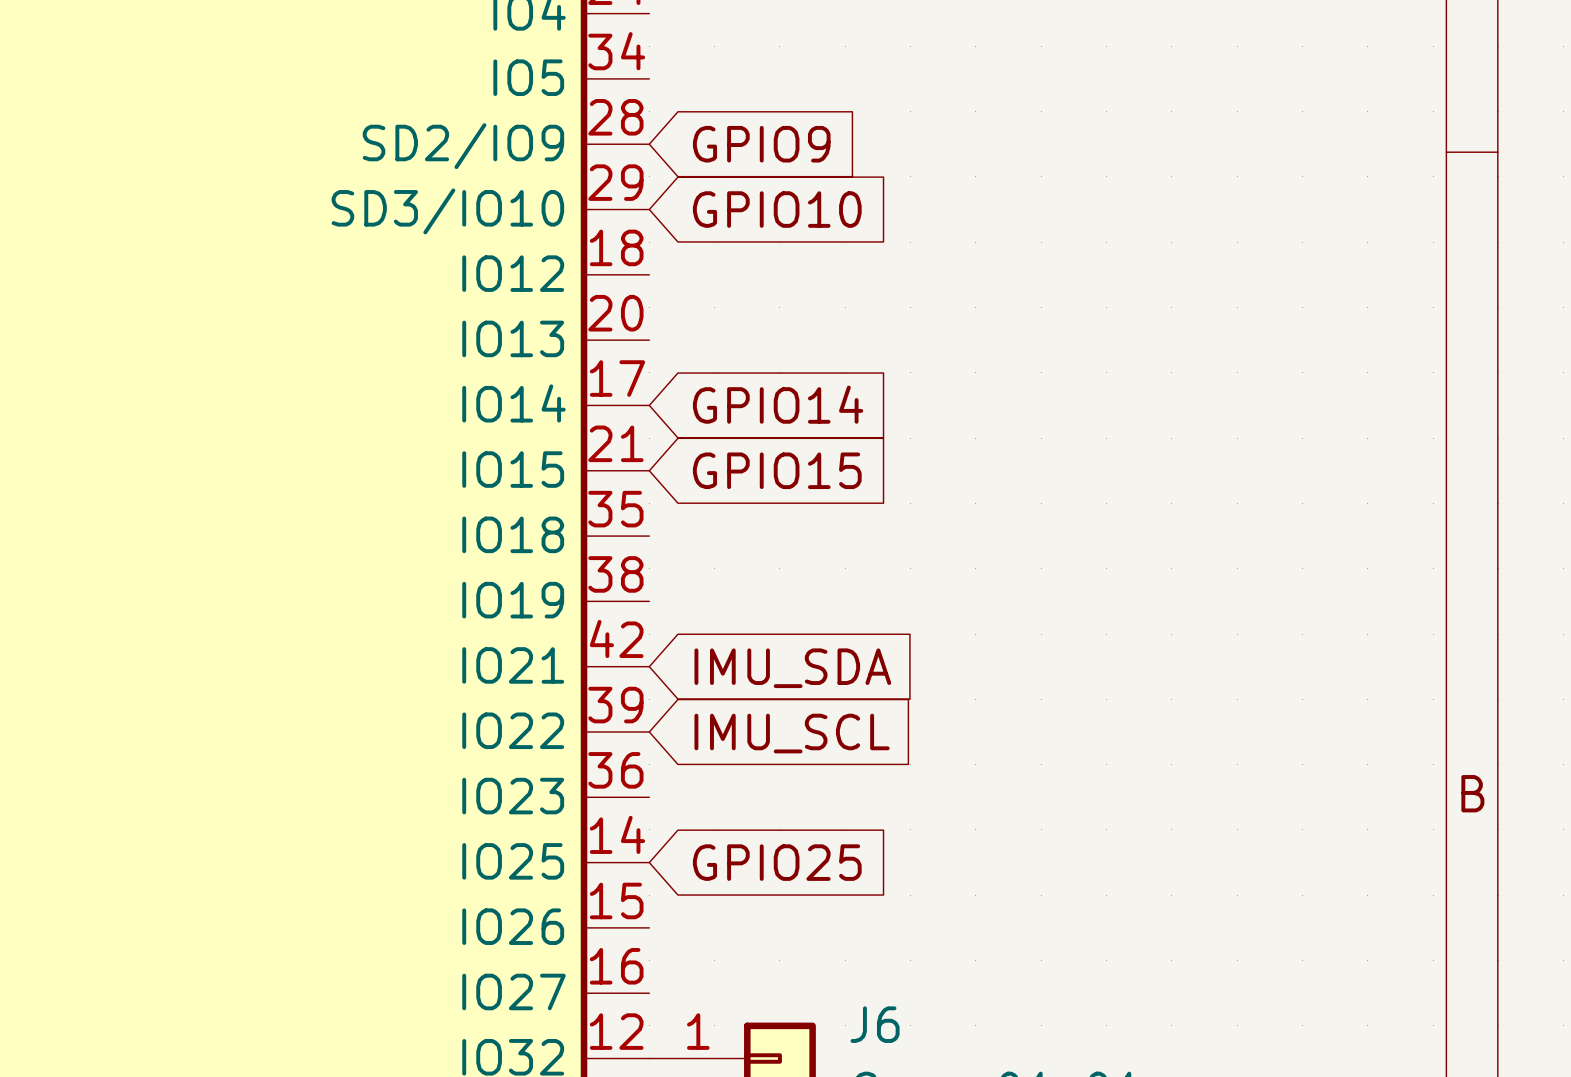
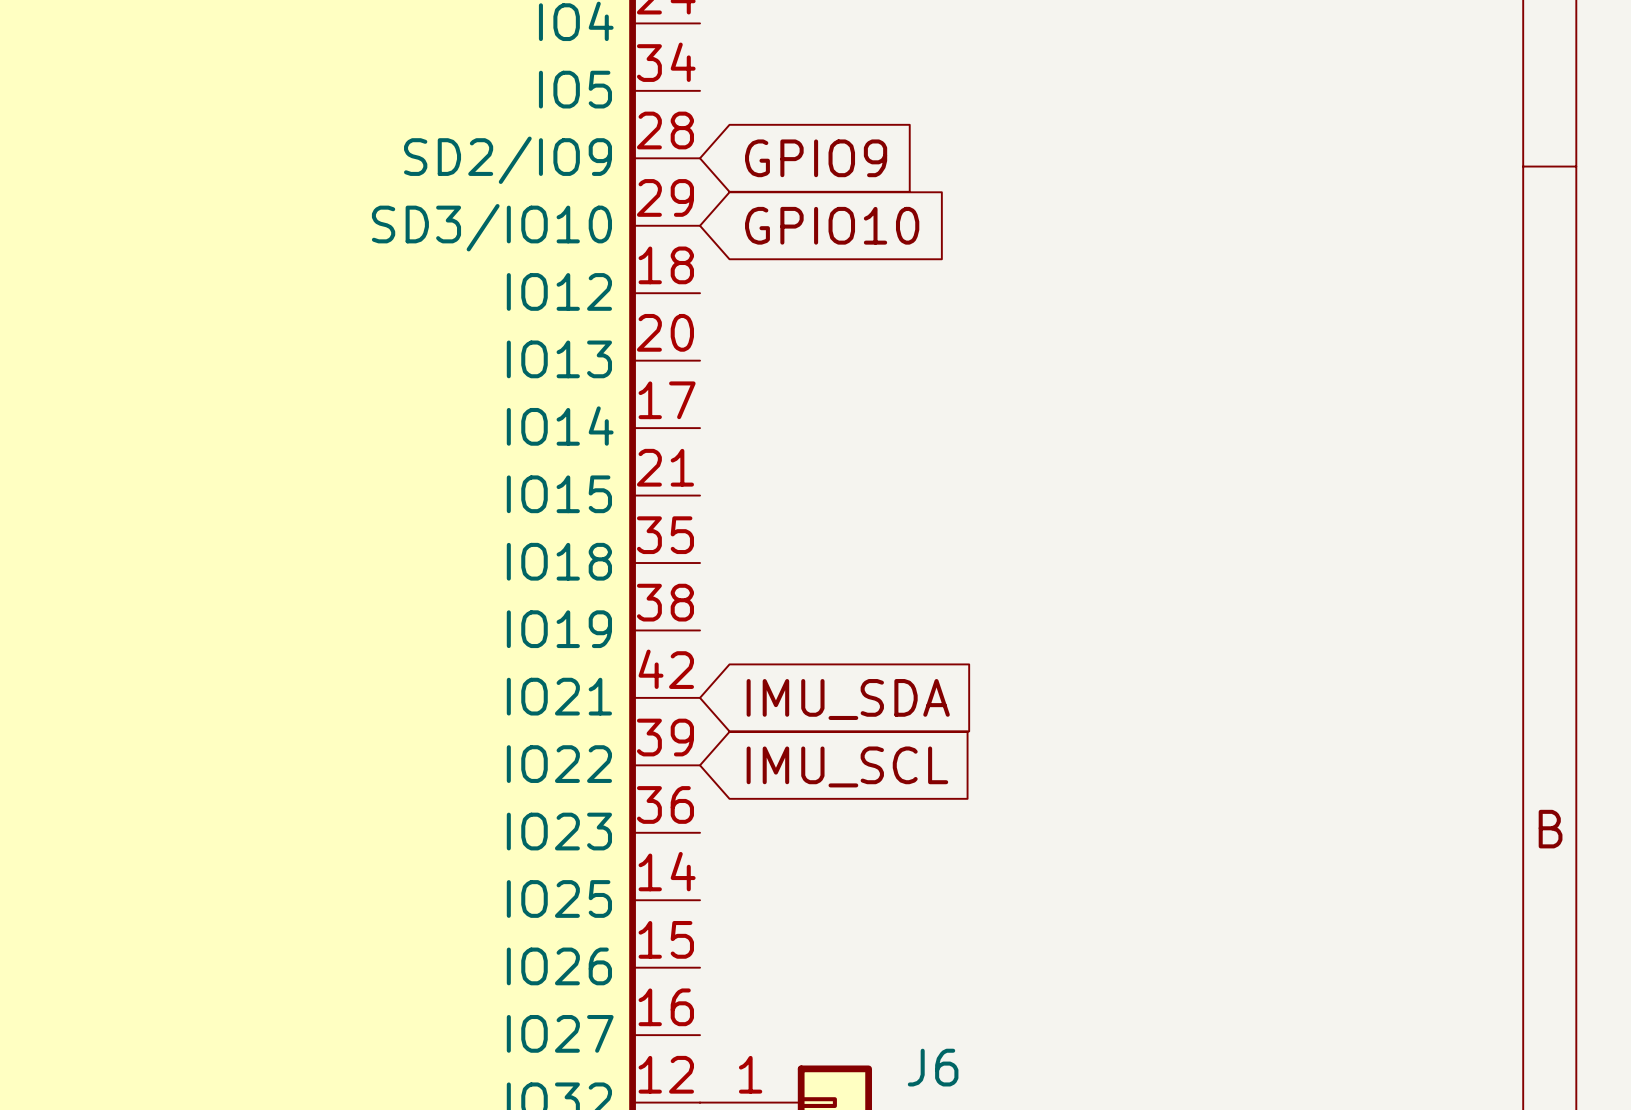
global label: GPIO14 (778, 404) -> none
global label: GPIO15 (777, 470) -> none
global label: GPIO25 (777, 862) -> none

